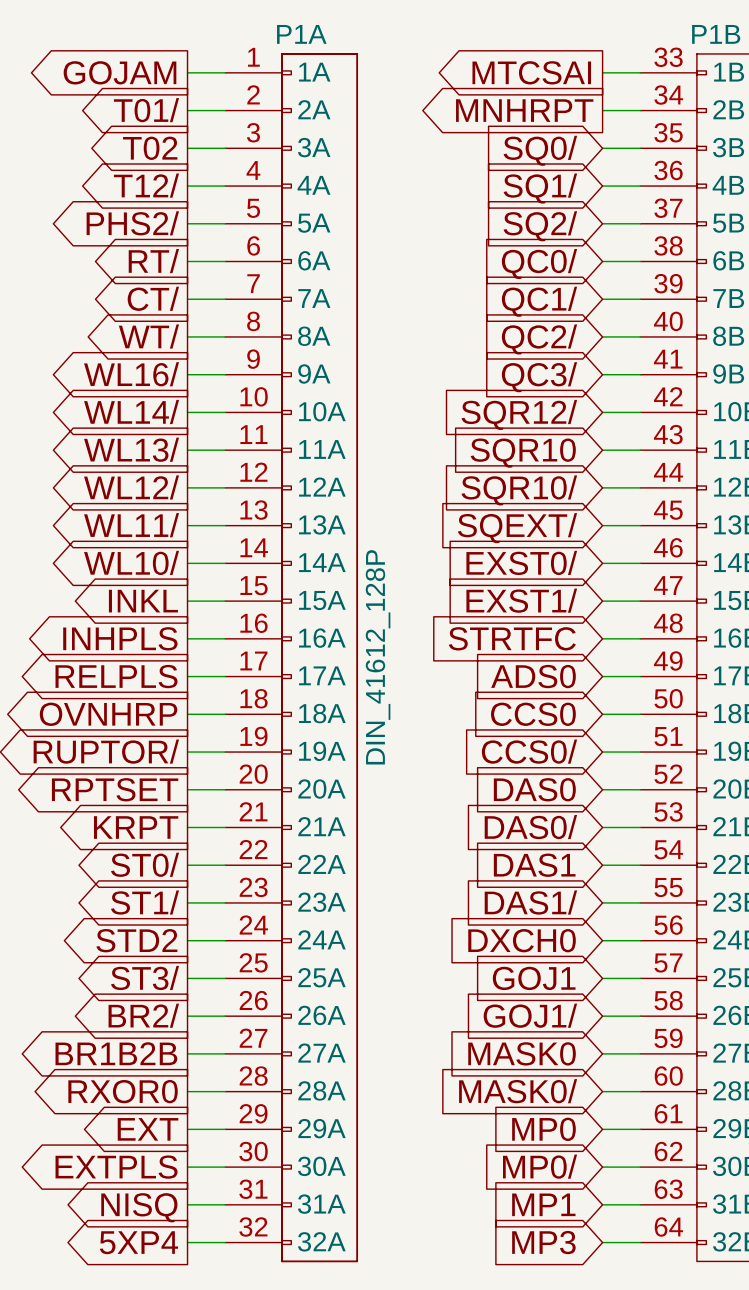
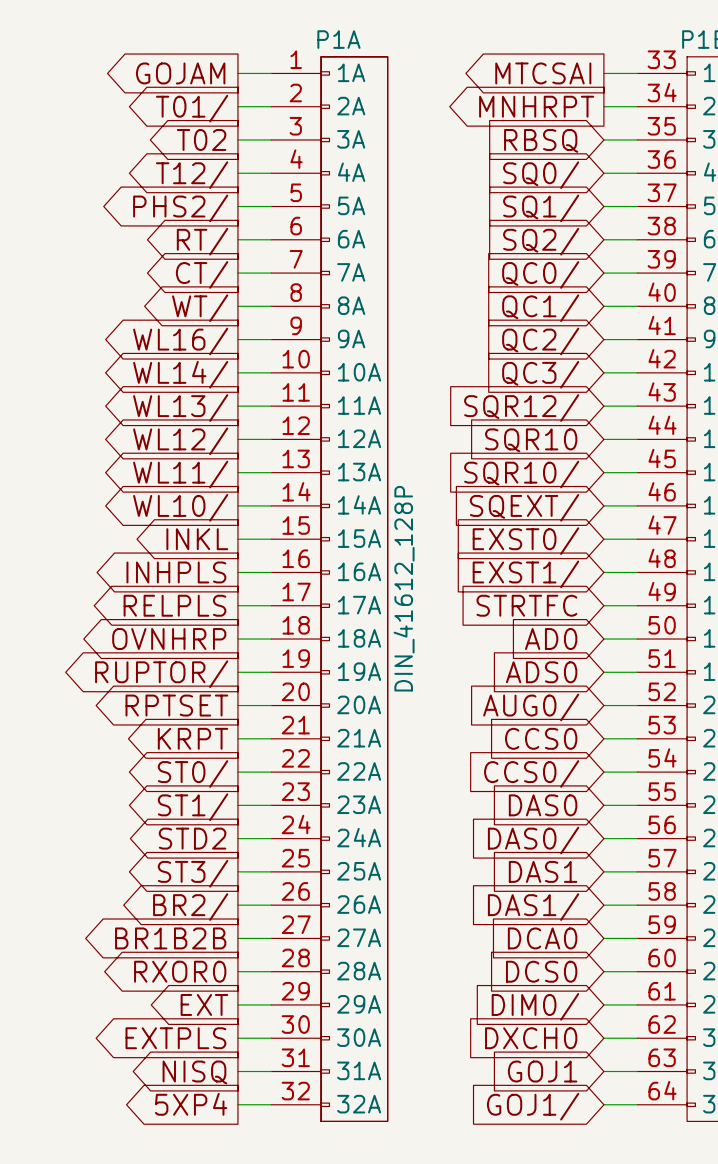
global label: SQ0/ (540, 150) -> RBSQ (541, 140)
global label: SQ1/ (540, 188) -> SQ0/ (541, 175)
global label: SQ2/ (540, 226) -> SQ1/ (541, 208)
global label: QC0/ (539, 264) -> SQ2/ (541, 241)
global label: QC1/ (539, 301) -> QC0/ (540, 274)
global label: QC2/ (539, 339) -> QC1/ (540, 308)
global label: QC3/ (539, 377) -> QC2/ (540, 341)
global label: SQR12/ (519, 414) -> QC3/ (540, 374)
global label: SQR10 (523, 453) -> SQR12/ (521, 408)
global label: SQR10/ (519, 490) -> SQR10 (531, 440)
global label: SQEXT/ (517, 528) -> SQR10/ (521, 474)
global label: EXST0/ (521, 562) -> SQEXT/ (524, 507)
global label: EXST1/ (521, 600) -> EXST0/ (525, 541)
global label: STRTFC (512, 638) -> EXST1/ (525, 574)
global label: ADS0 (533, 676) -> STRTFC (526, 605)
global label: CCS0 (533, 714) -> AD0 (551, 639)
global label: CCS0/ (529, 751) -> ADS0 (541, 672)
global label: DAS0 (534, 789) -> AUG0/ (531, 707)
global label: DAS0/ (530, 827) -> CCS0 (541, 738)
global label: DAS1 (534, 865) -> CCS0/ (531, 773)
global label: DAS1/ (530, 902) -> DAS0 (543, 805)
global label: DXCH0 (522, 940) -> DAS0/ (533, 840)
global label: GOJ1 (534, 978) -> DAS1 (543, 871)
global label: GOJ1/ (530, 1015) -> DAS1/ (533, 907)
global label: MASK0 (522, 1053) -> DCA0 (542, 938)
global label: MASK0/ (518, 1091) -> DCS0 (541, 971)
global label: MP0 (543, 1129) -> DIM0/ (535, 1006)
global label: MP0/ (540, 1166) -> DXCH0 (531, 1038)
global label: MP1 (543, 1204) -> GOJ1 (542, 1071)
global label: MP3 (543, 1242) -> GOJ1/ (533, 1106)

